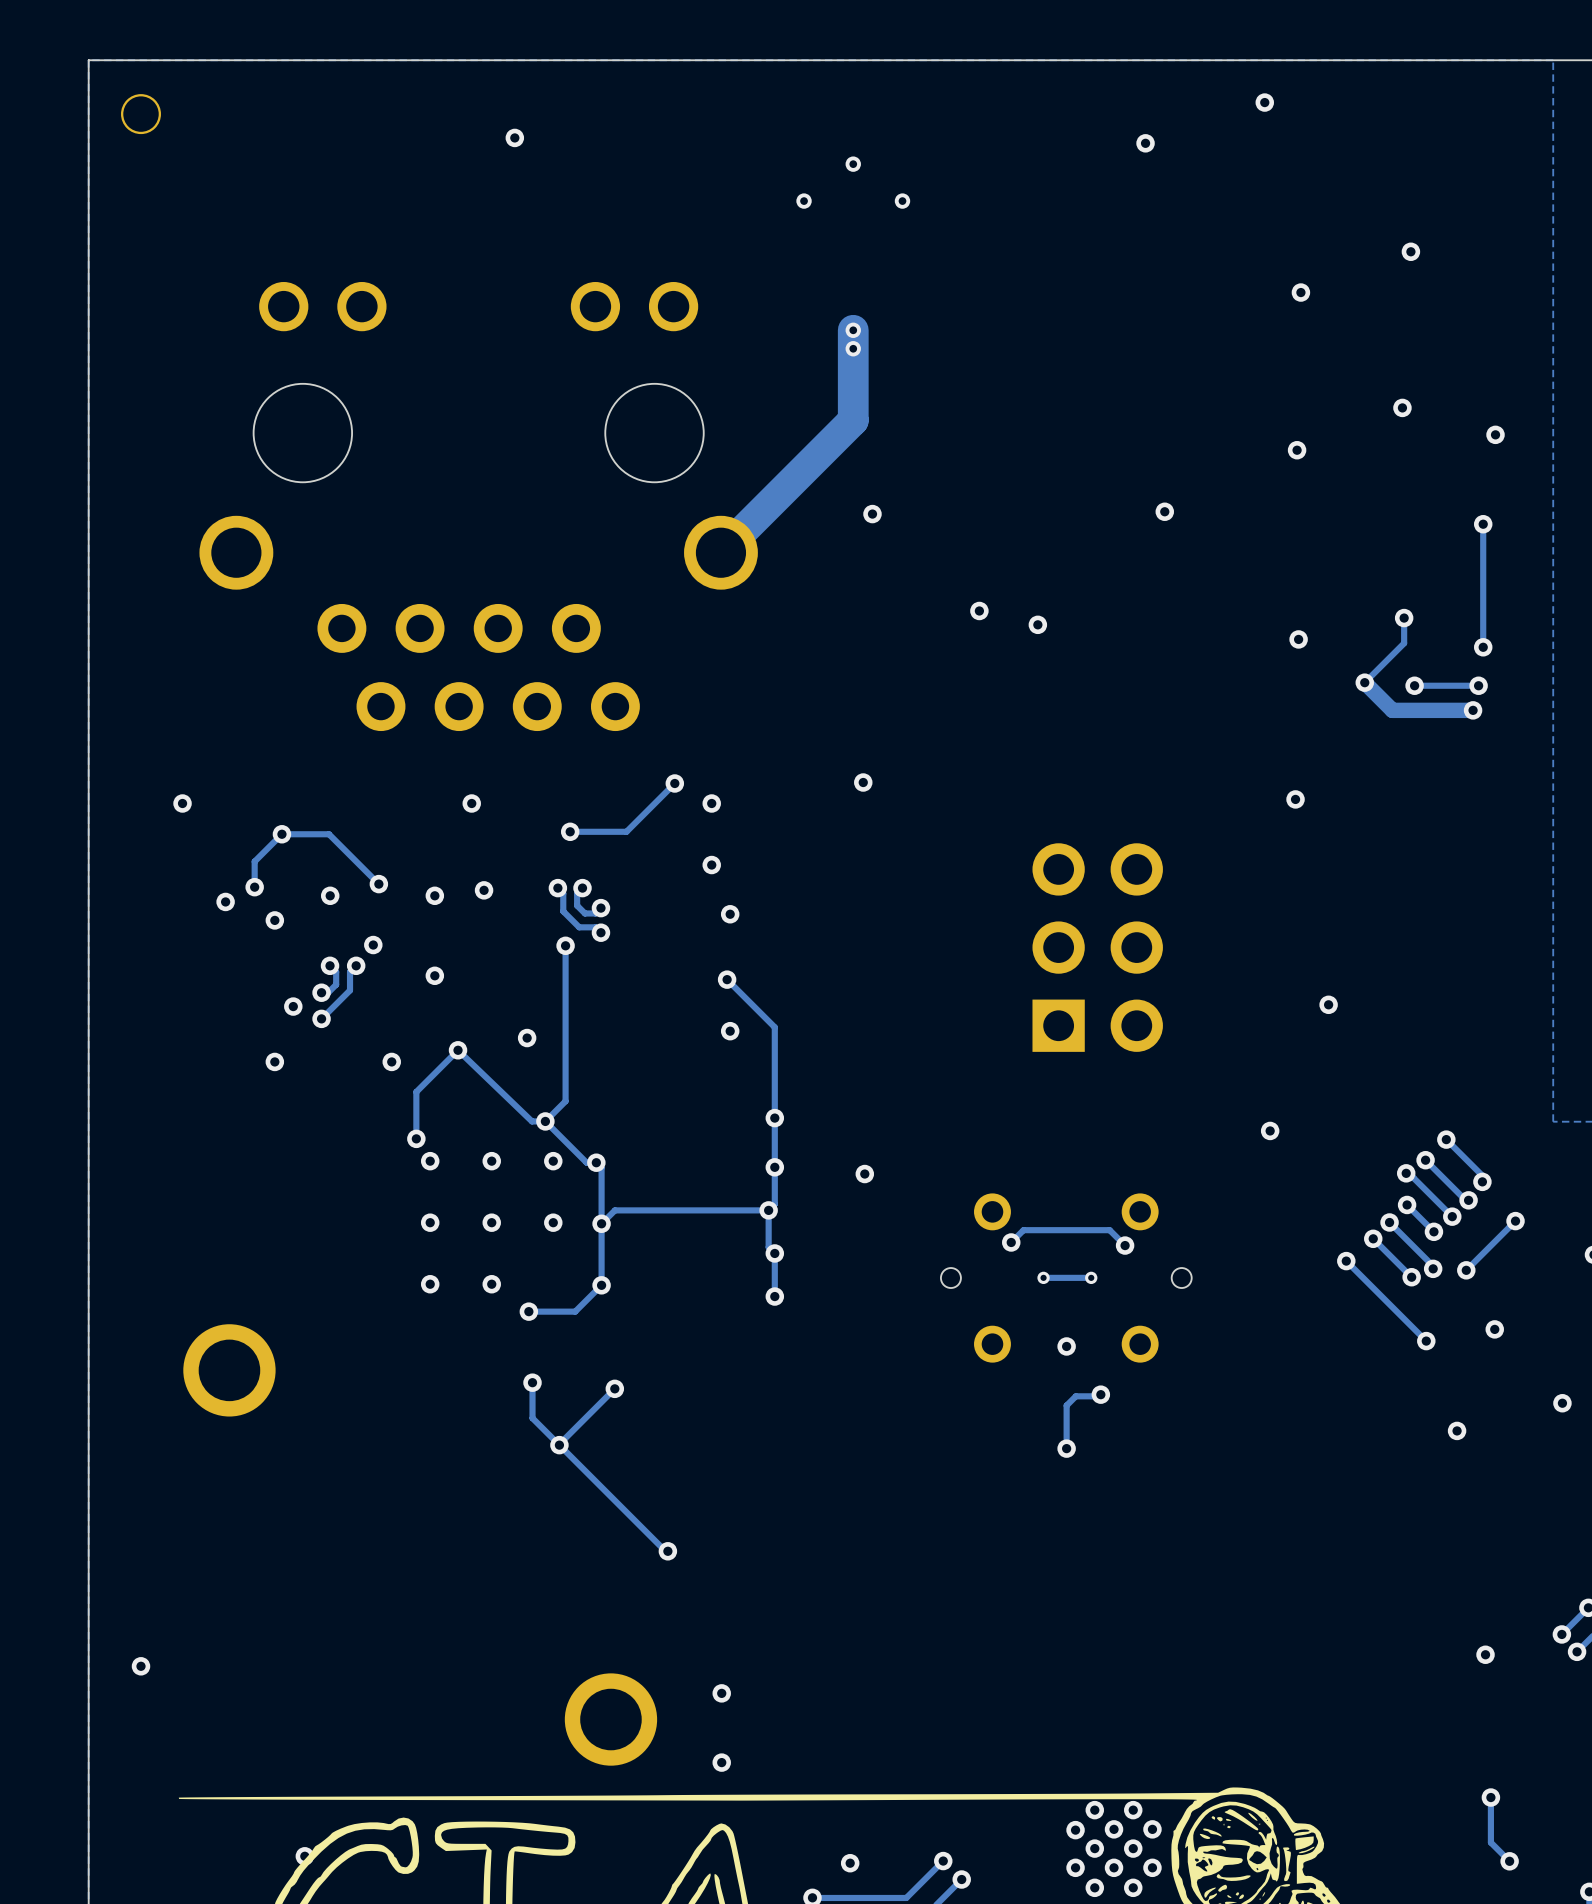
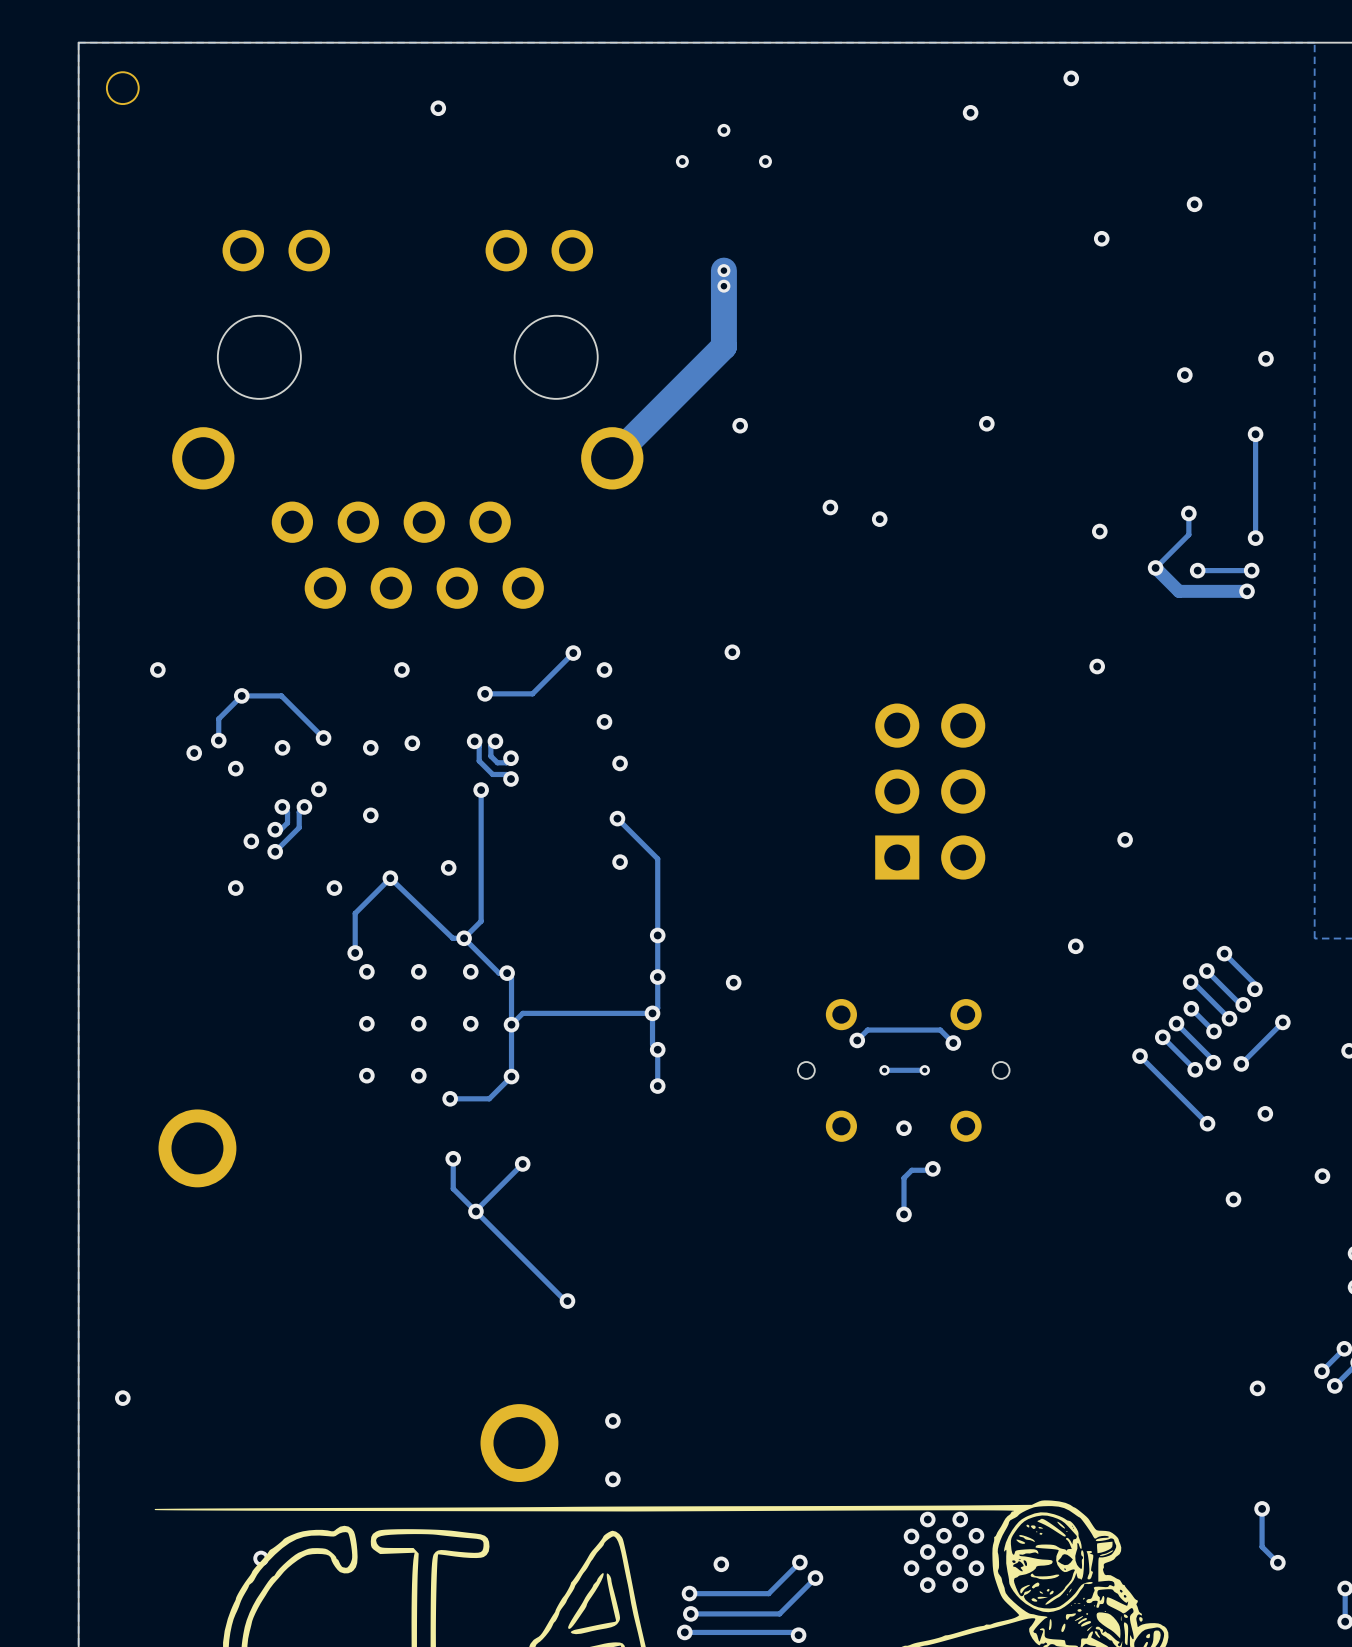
via position: (1402, 407) -> (1184, 375)
via: (1297, 450) -> none

